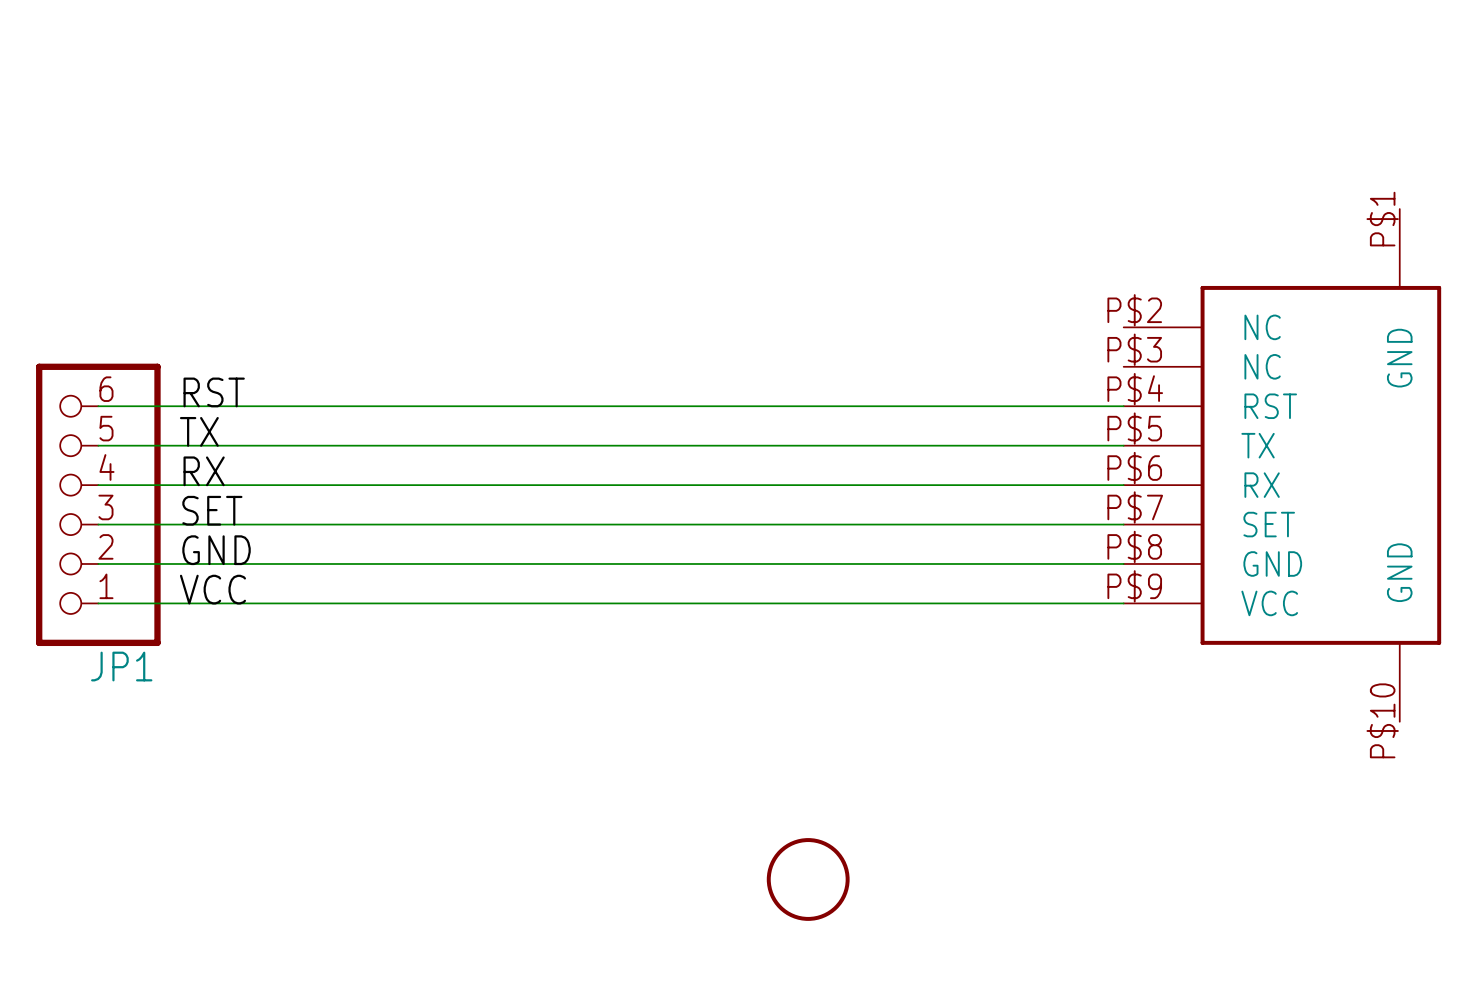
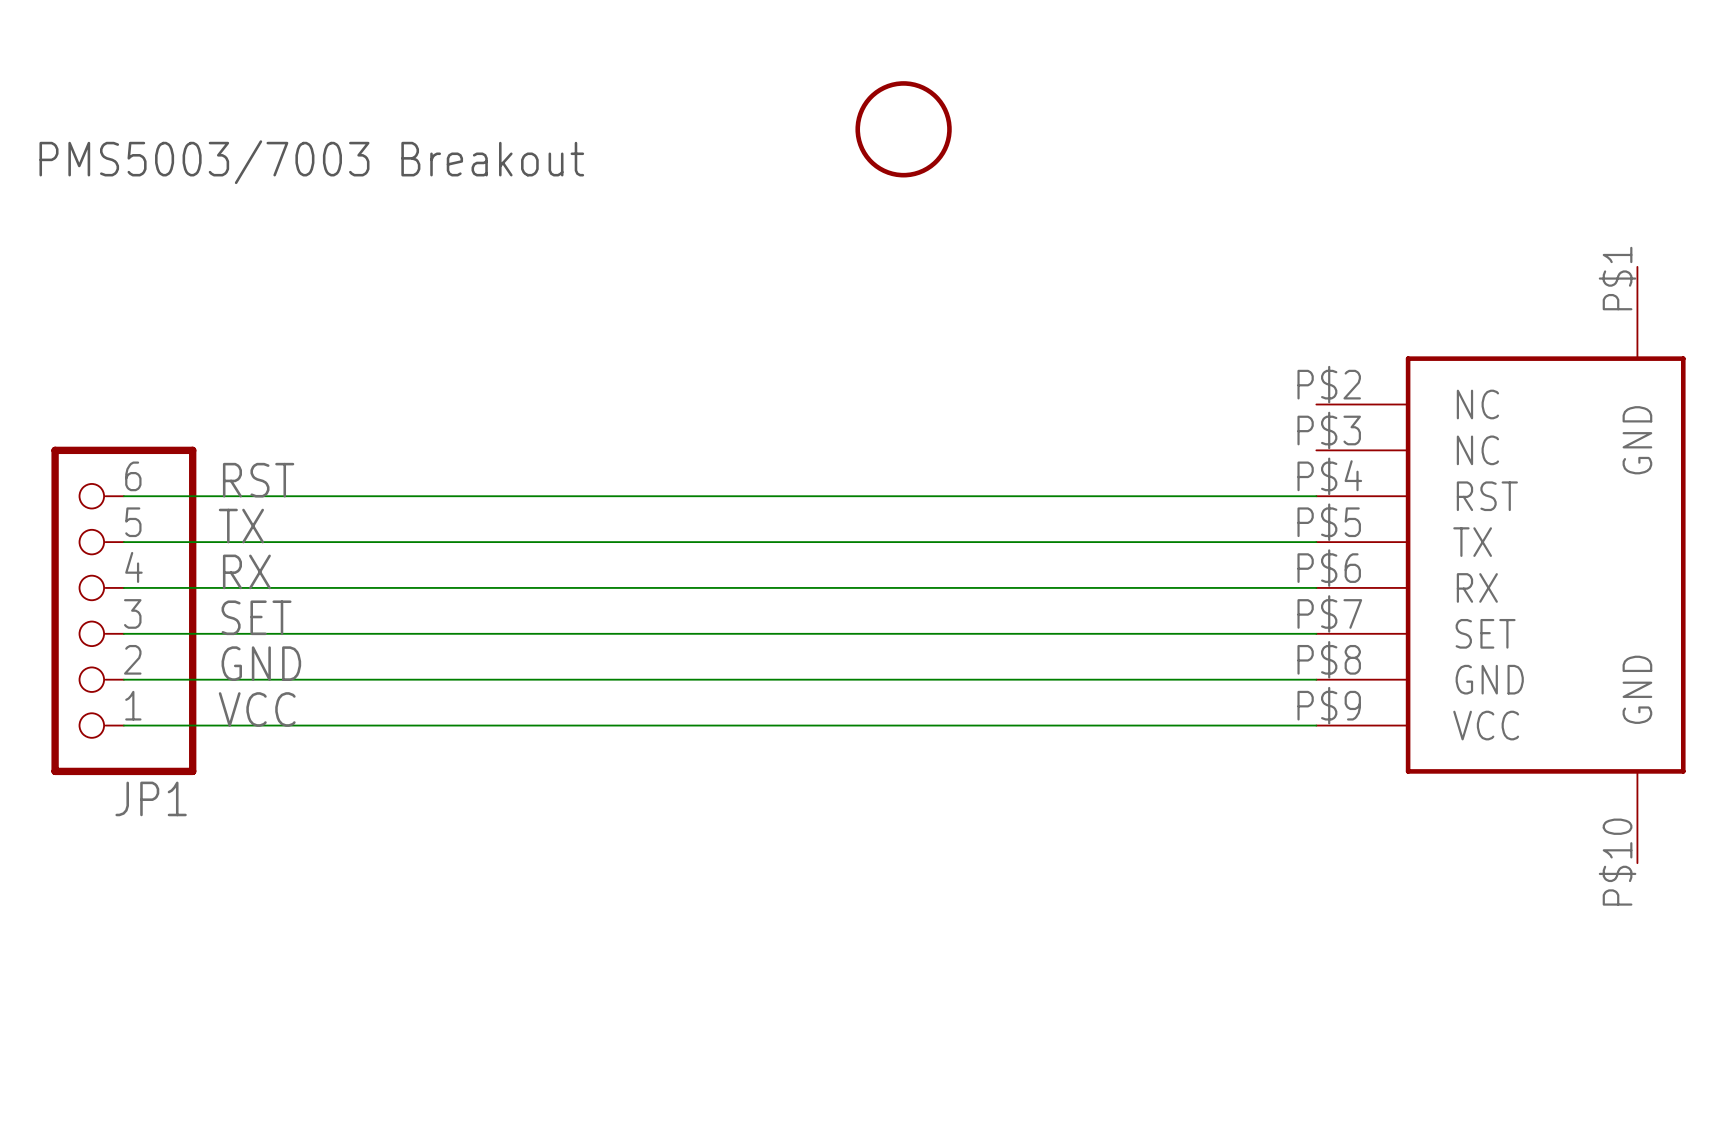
part: none -> (903, 129)
text: none -> PMS5003/7003 Breakout (311, 162)
part: (808, 879) -> none

